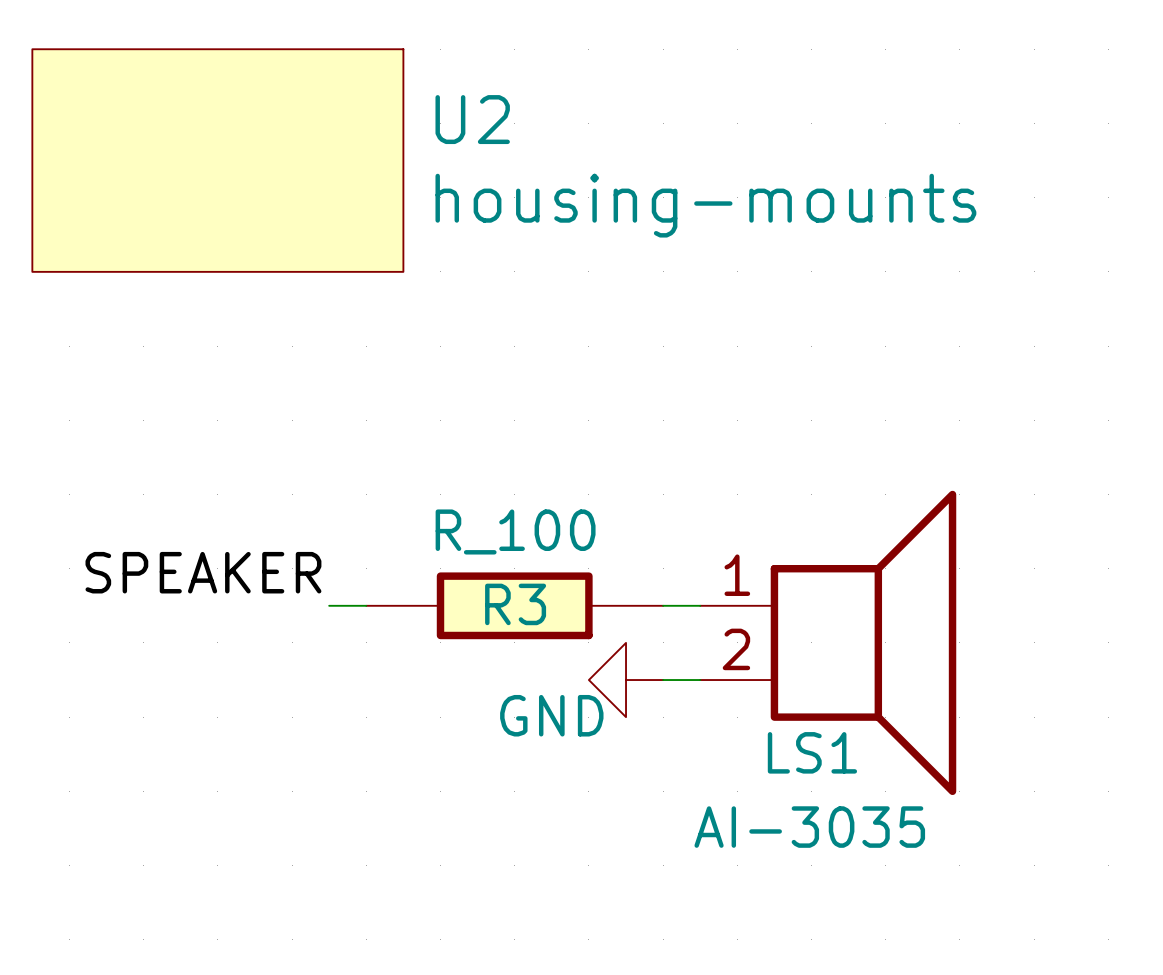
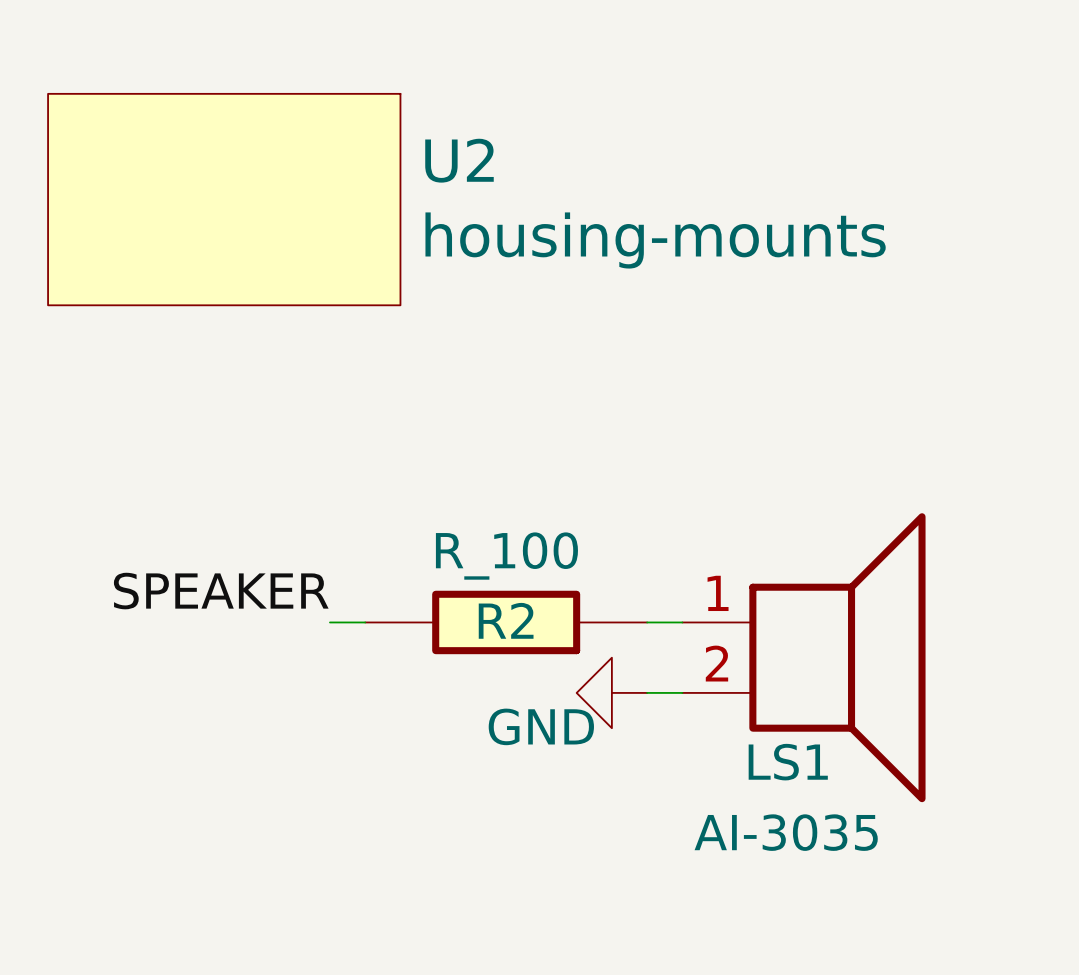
R3 name: R3 (515, 604) -> R2 (506, 620)

